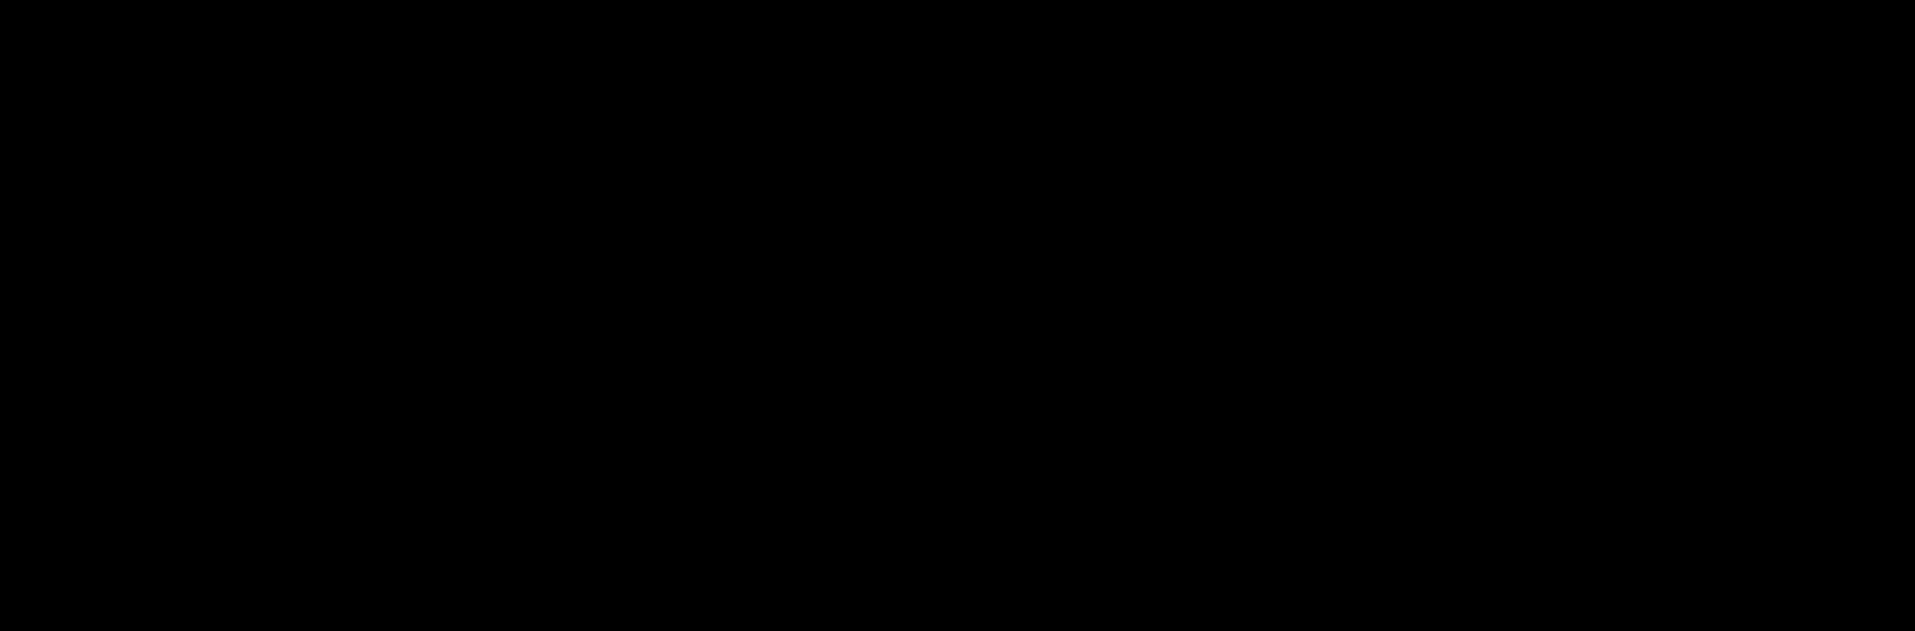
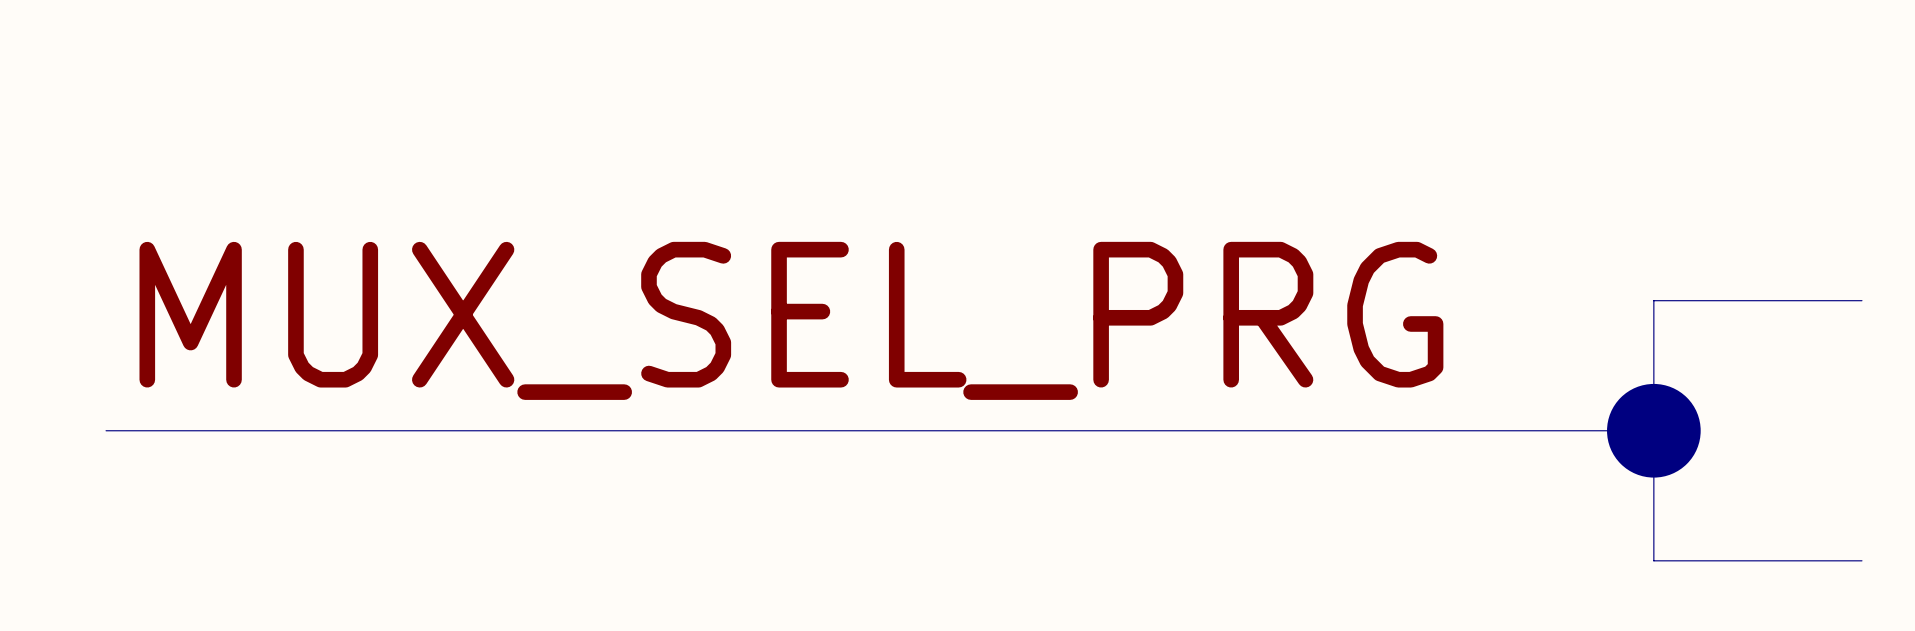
wire: none -> (1861, 300) (1653, 300) (1653, 560) (1861, 560)
label: none -> MUX_SEL_PRG (791, 320)
wire: none -> (106, 430) (1653, 430)
junction: none -> (1653, 430)

